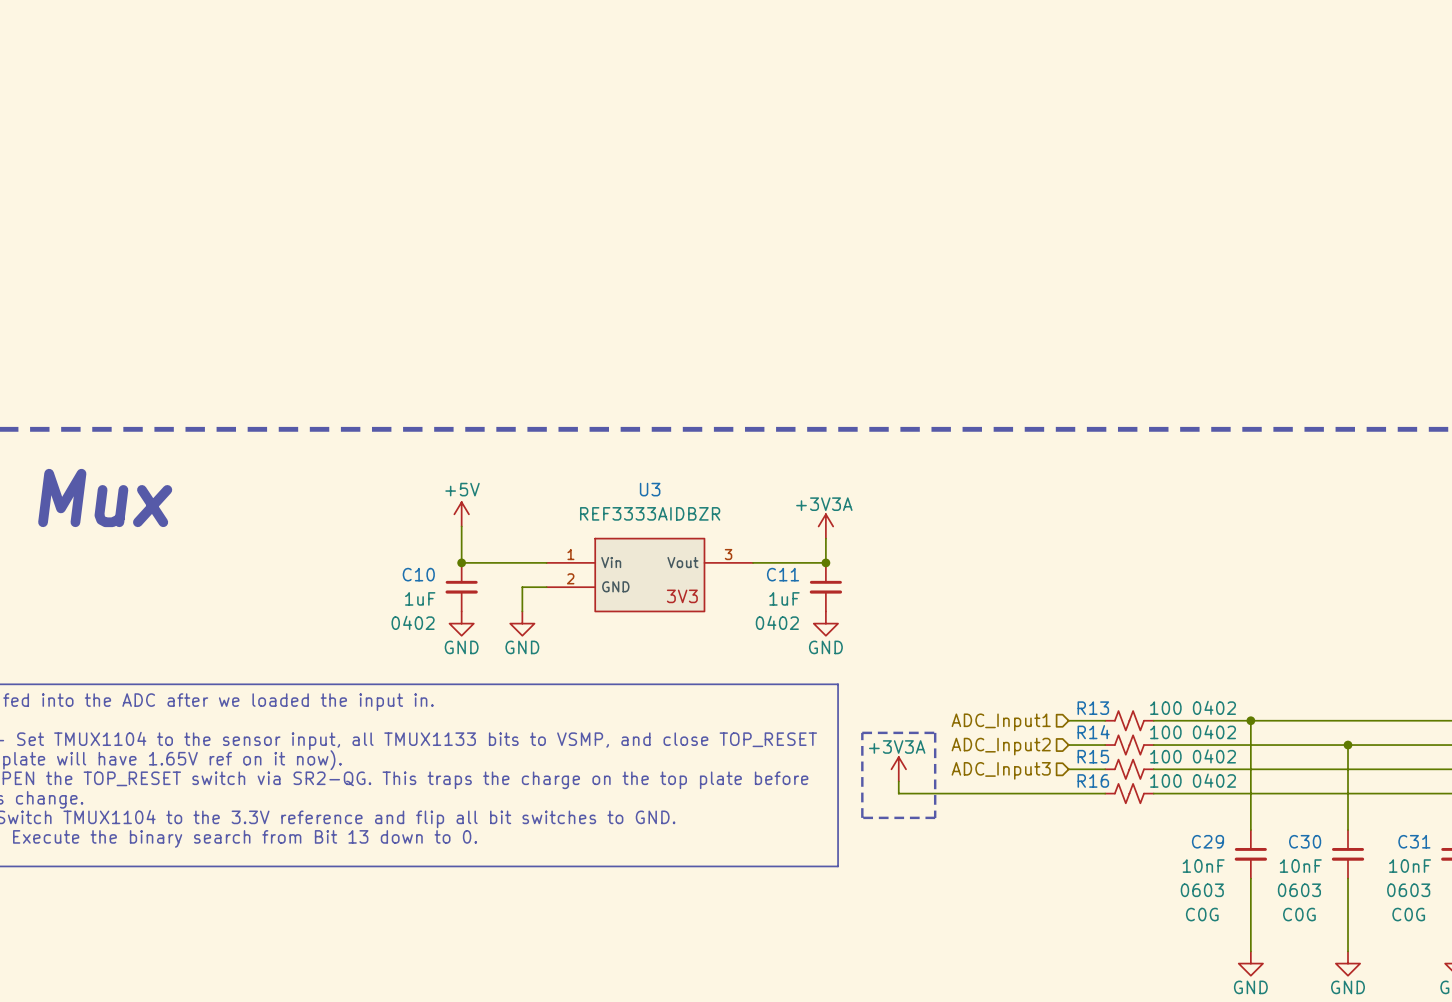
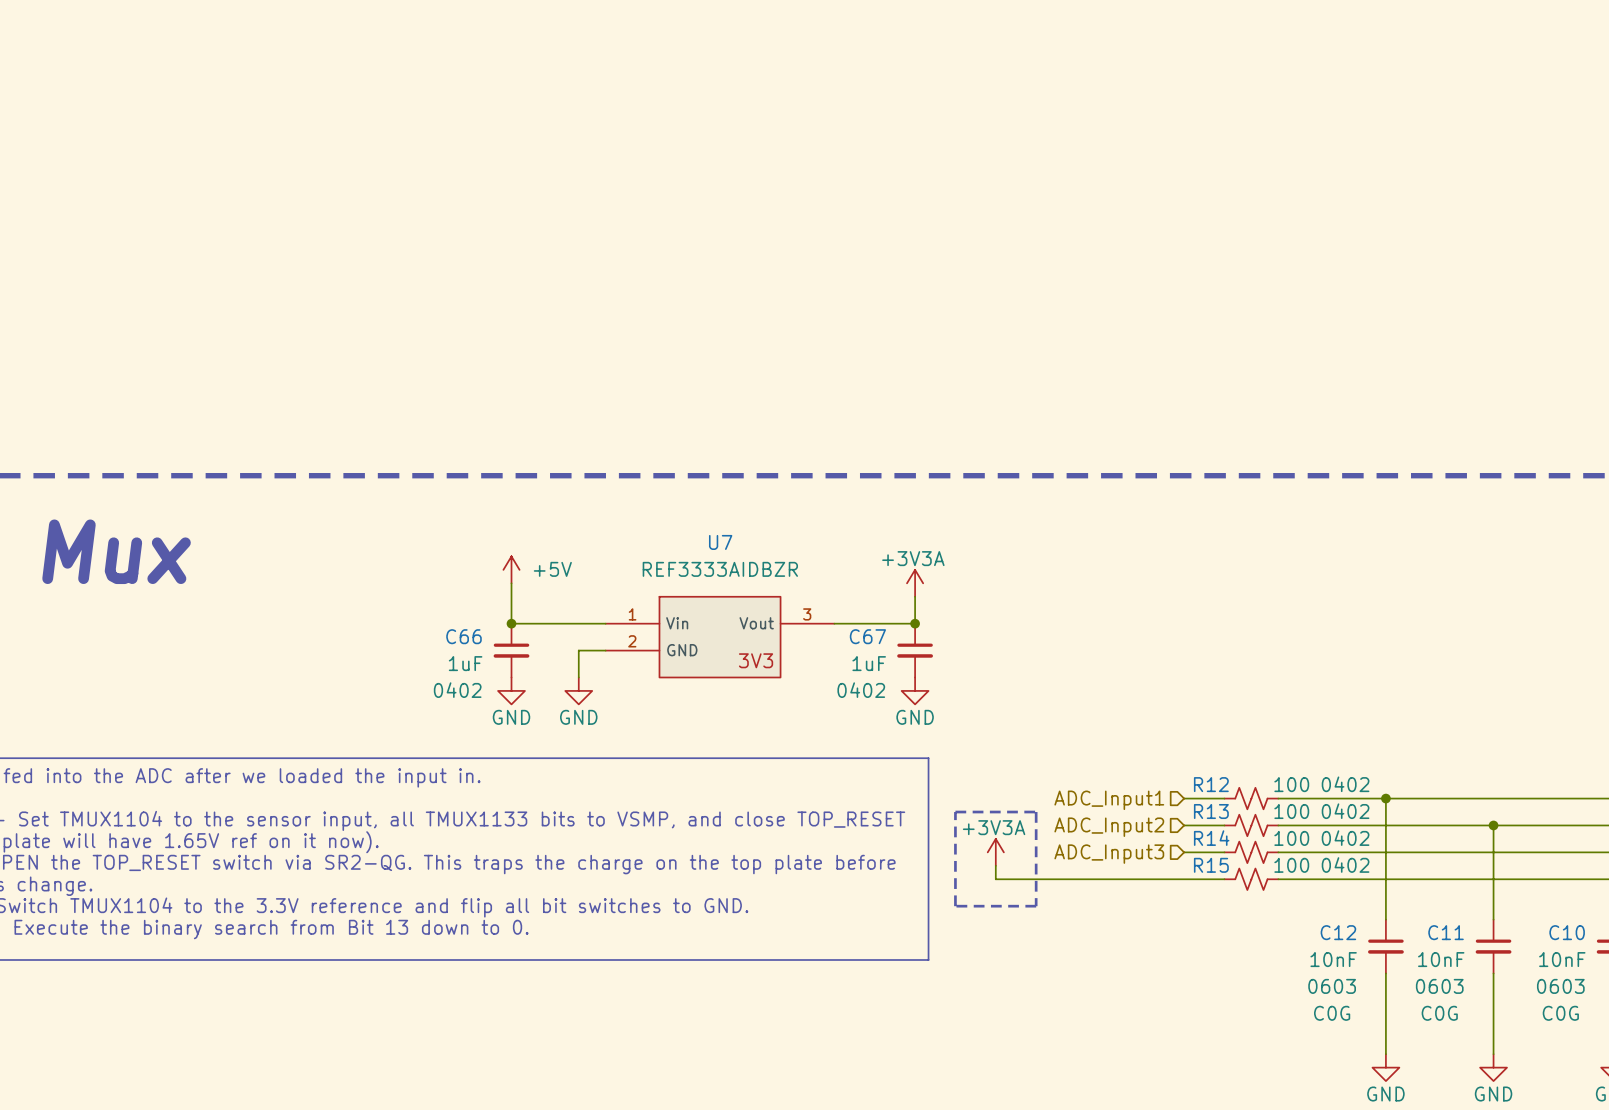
power symbol text position: +5V (462, 489) -> +5V (552, 569)
U3 name: U3 (650, 489) -> U7 (720, 542)
C10 name: C10 (418, 574) -> C66 (463, 636)
C11 name: C11 (783, 574) -> C67 (867, 636)
R13 name: R13 (1093, 708) -> R12 (1211, 784)
R14 name: R14 (1093, 732) -> R13 (1211, 811)
R15 name: R15 (1093, 756) -> R14 (1211, 838)
R16 name: R16 (1093, 780) -> R15 (1211, 865)
C29 name: C29 (1207, 841) -> C12 (1338, 932)
C30 name: C30 (1305, 841) -> C11 (1446, 932)
C31 name: C31 (1414, 841) -> C10 (1567, 932)

